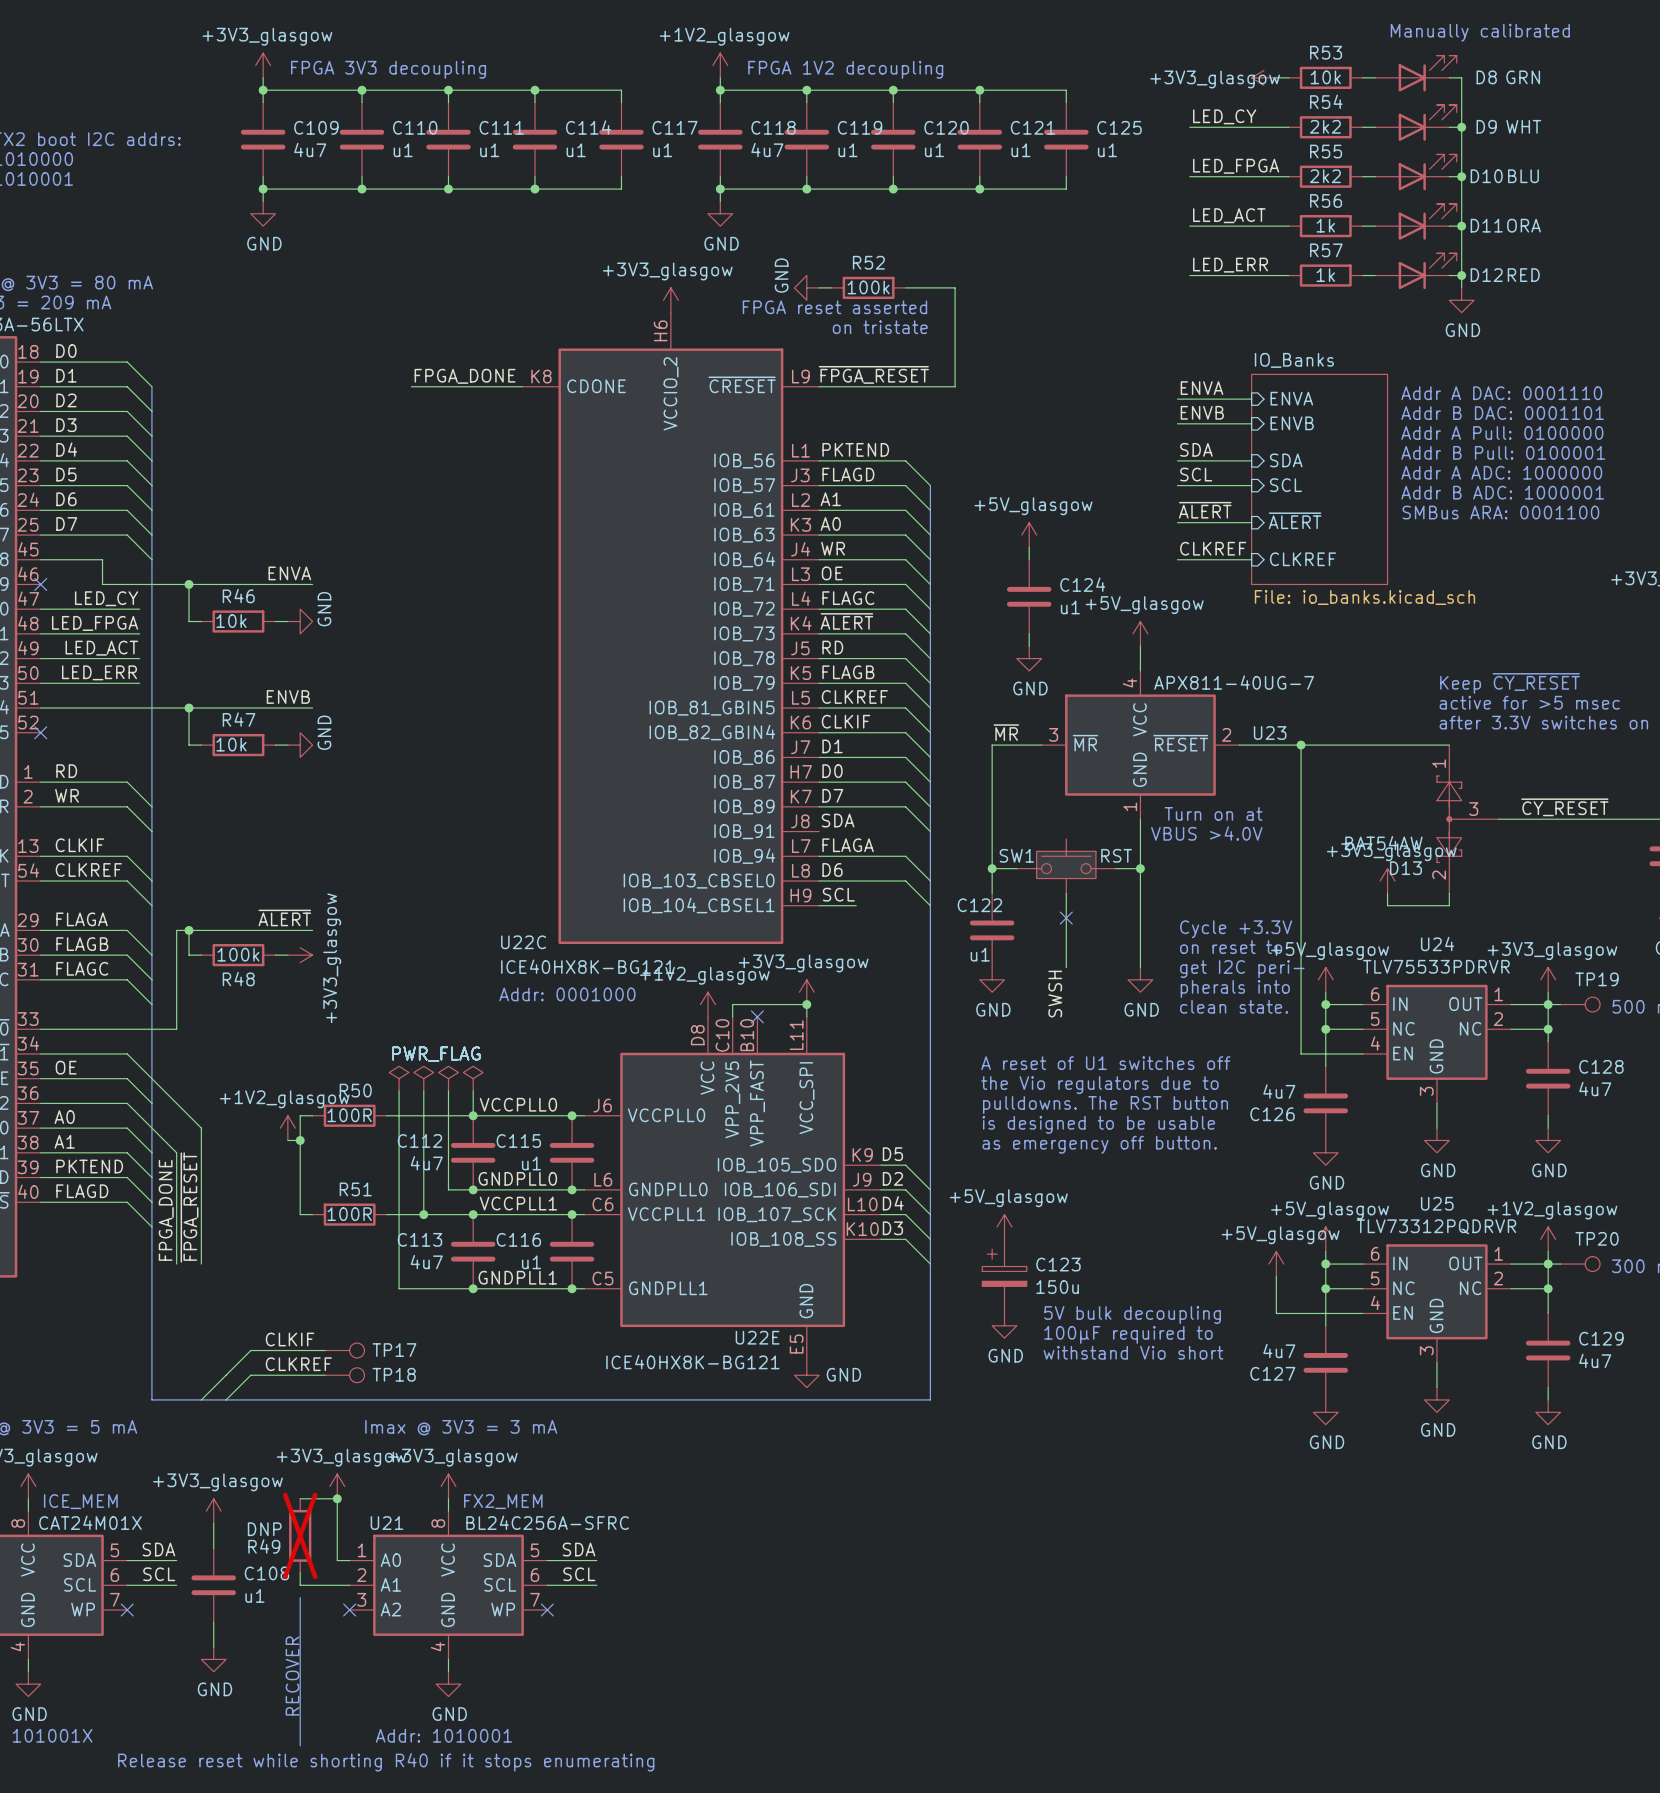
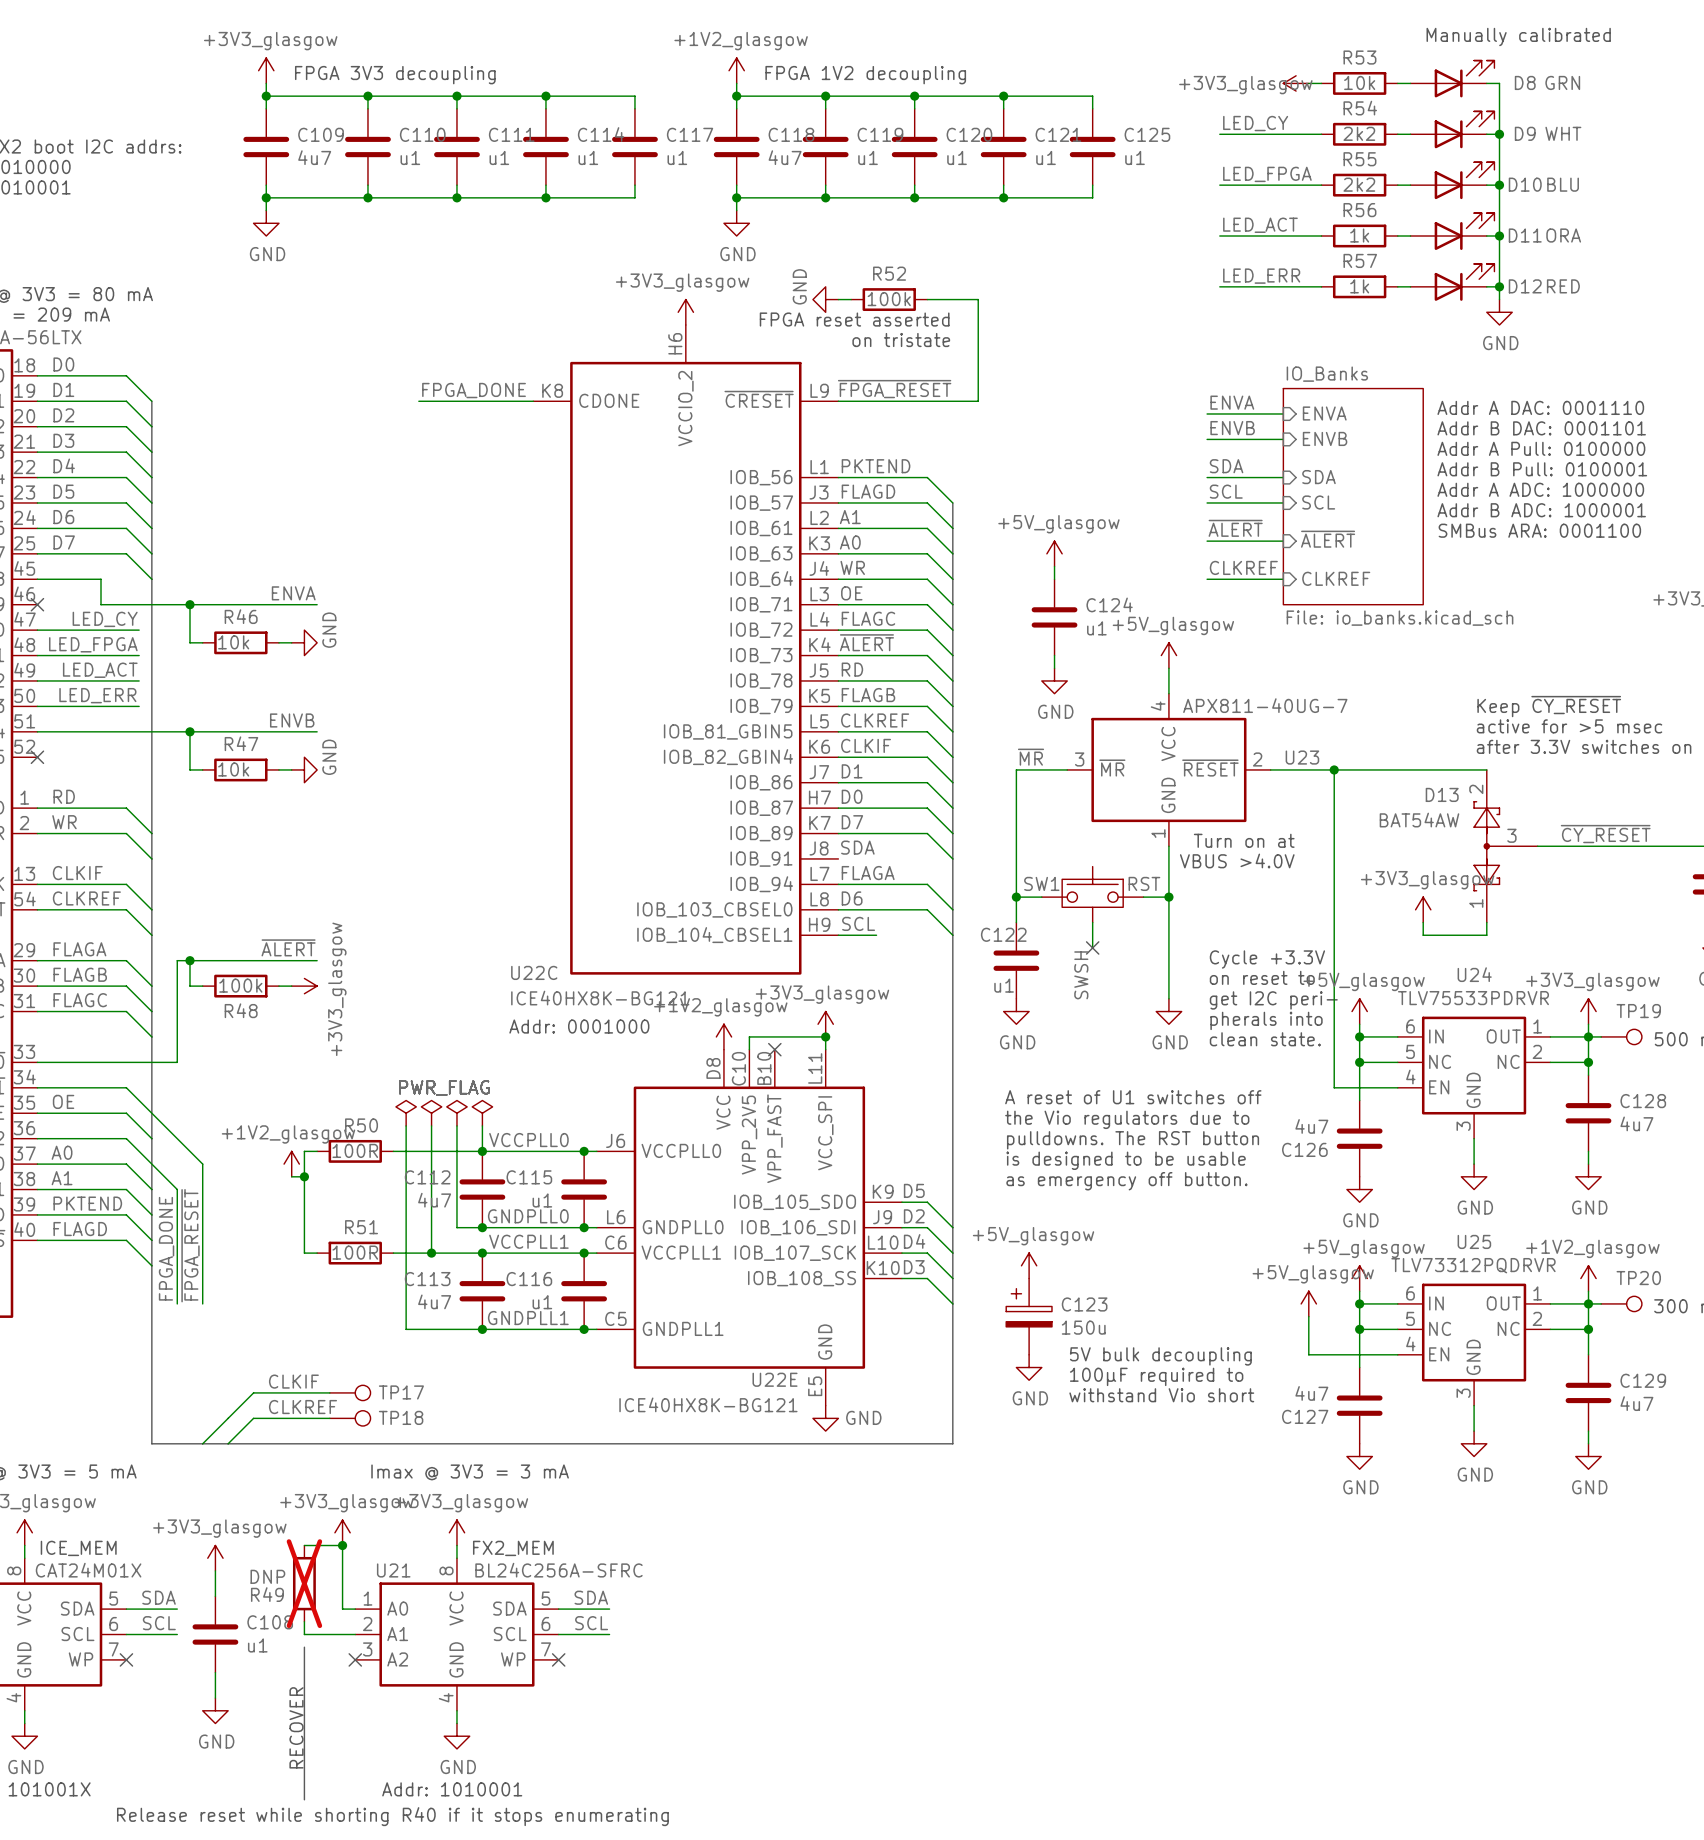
D13 flip: as is (1449, 819) -> up-down (1486, 846)
wire: (1066, 918) (1066, 967) -> none
label position: SWSH (1055, 994) -> SWSH (1081, 975)

